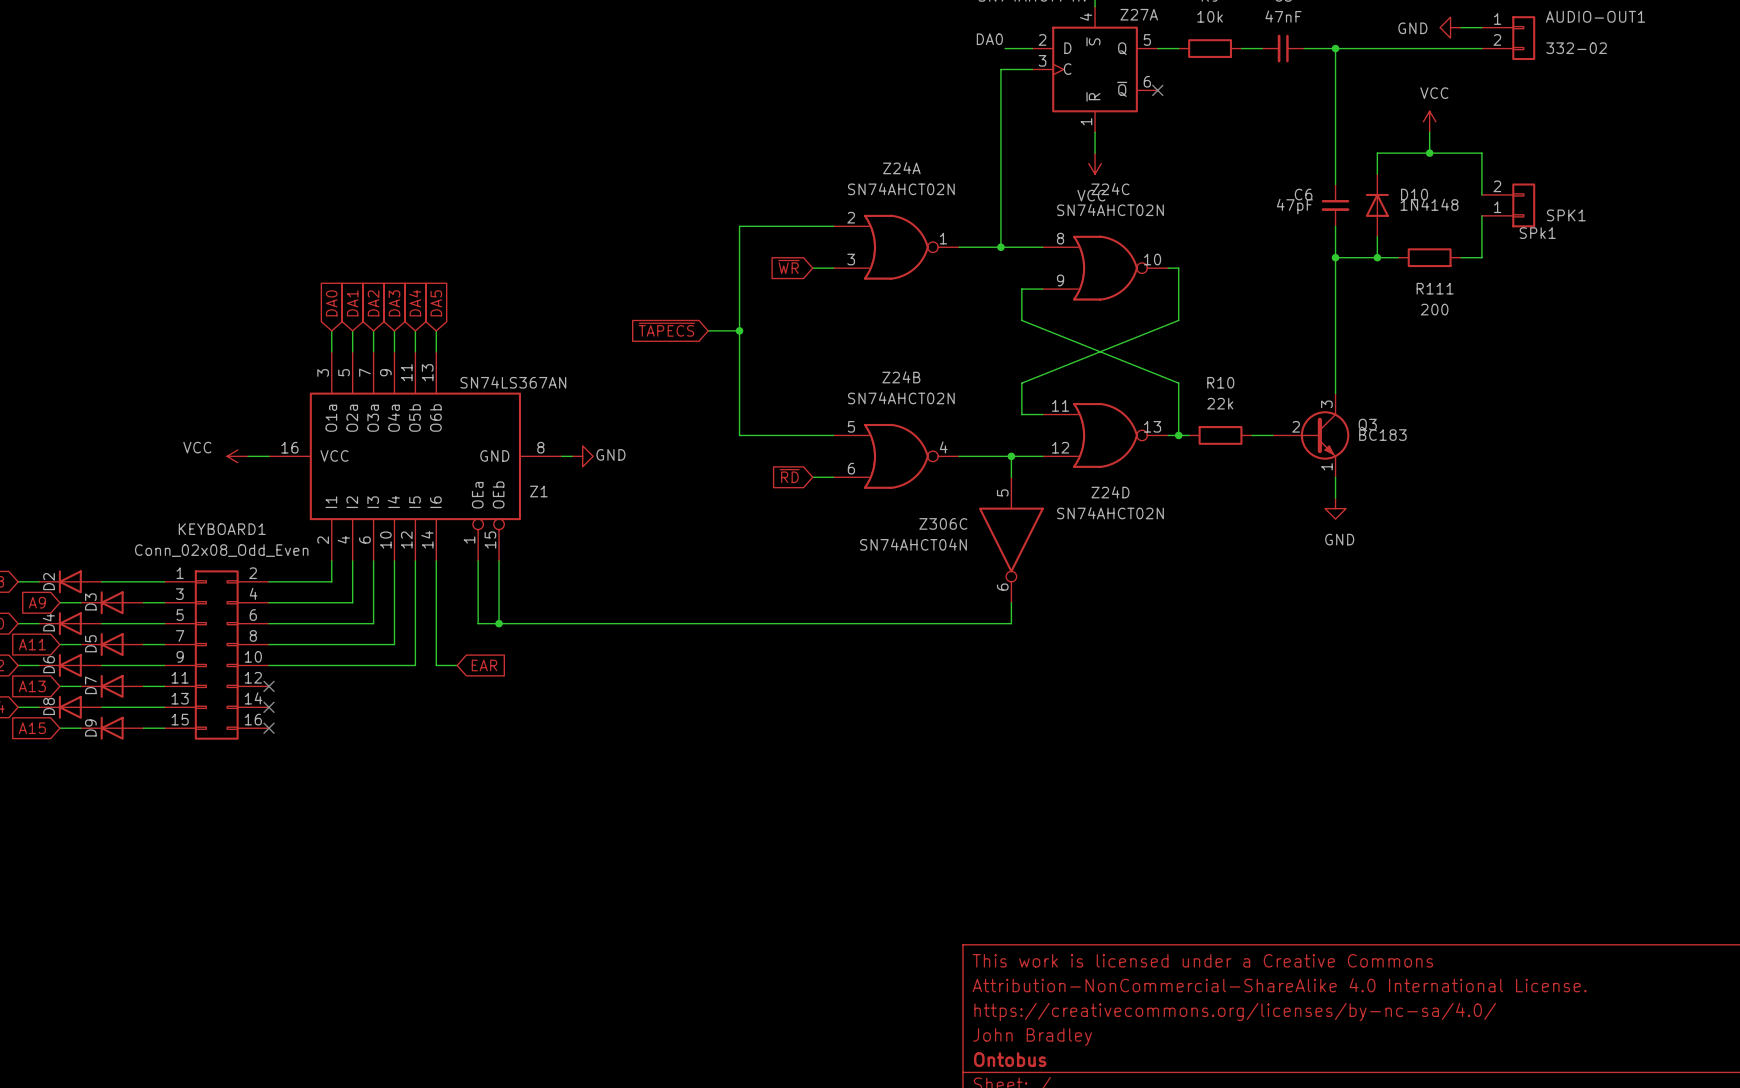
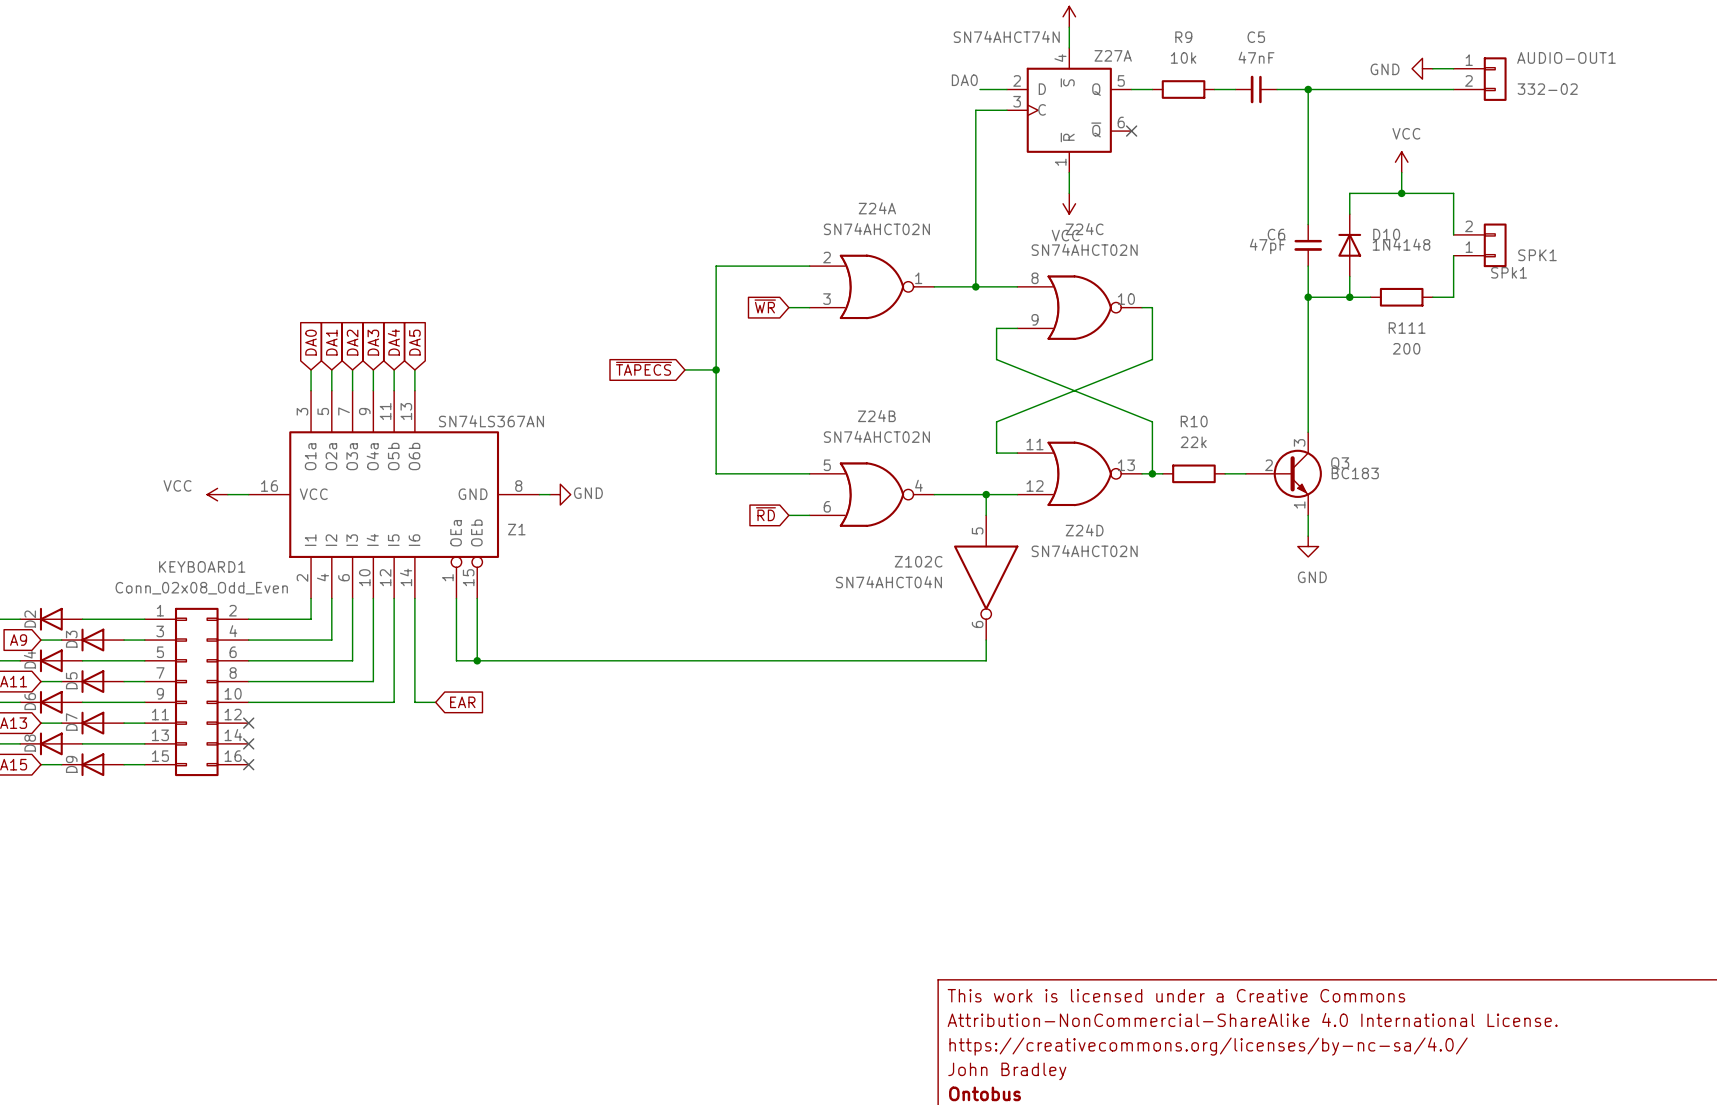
Z306C name: Z306C (943, 523) -> Z102C (918, 561)

